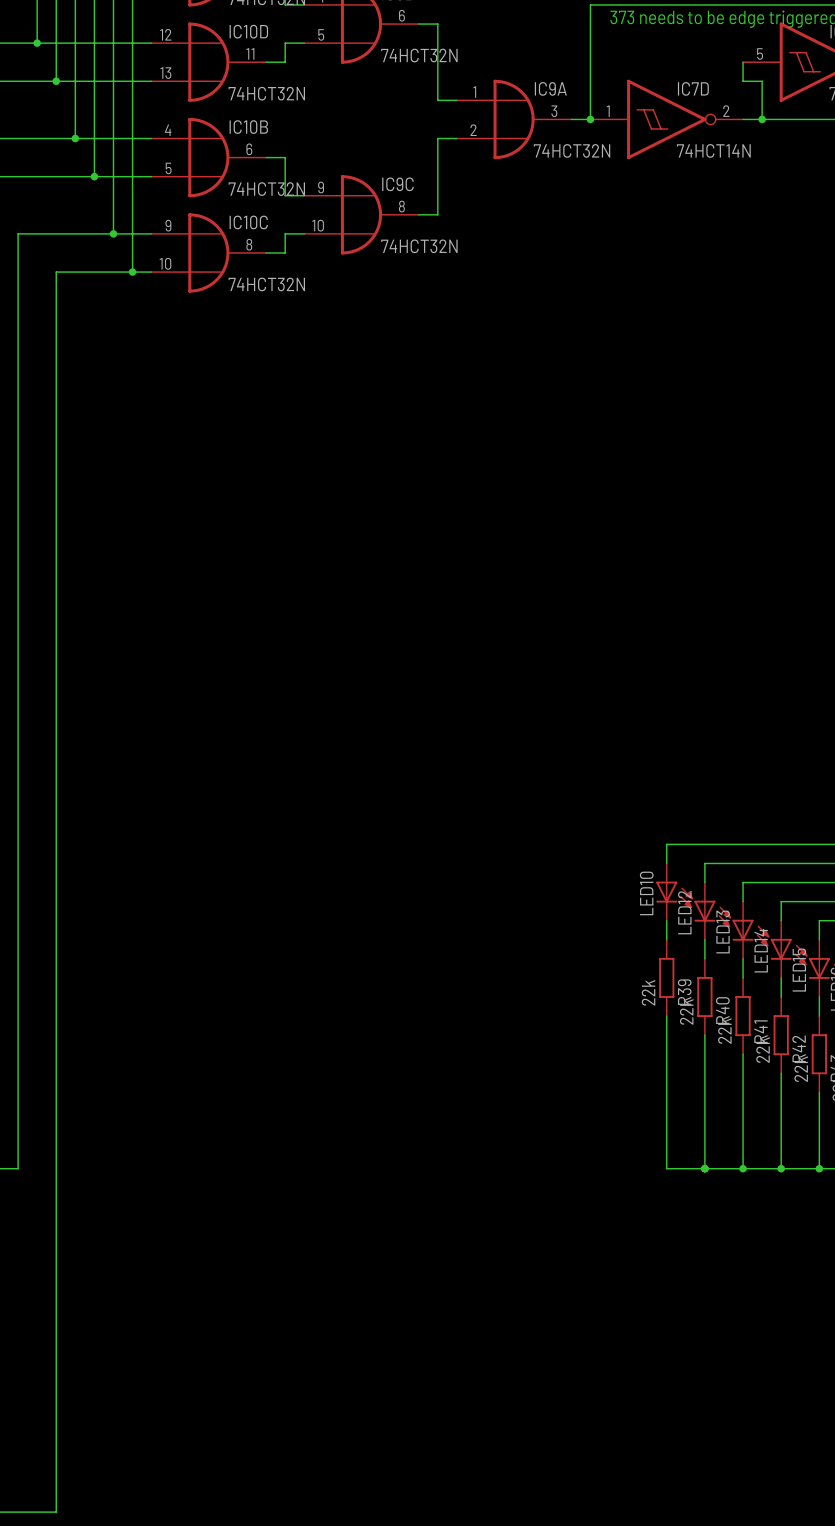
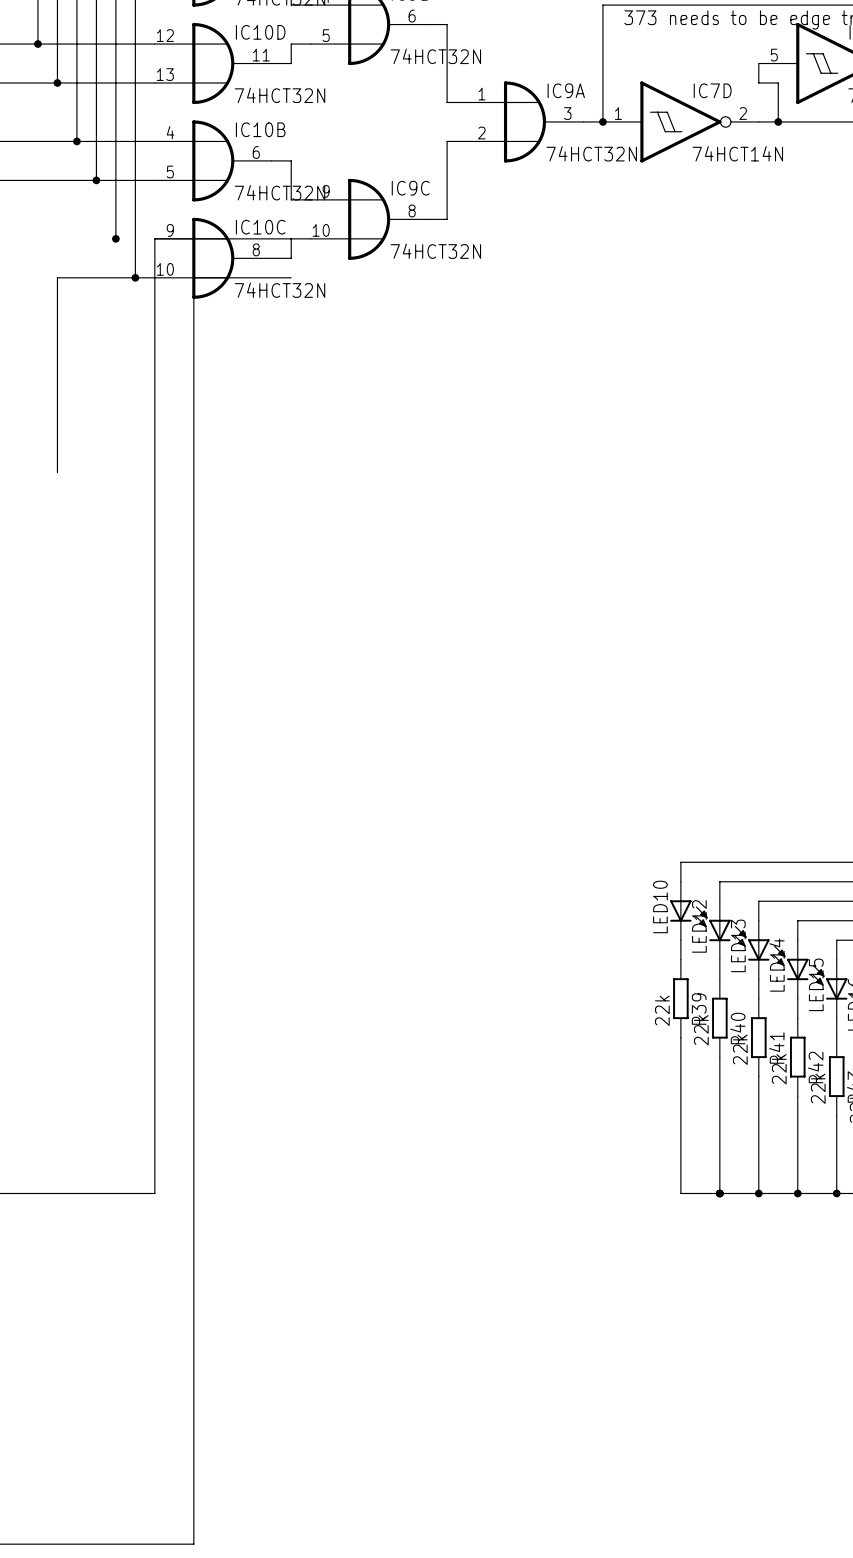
wire: (151, 233) (18, 233) (18, 1168) -> (291, 238) (154, 238) (154, 1193) (18, 1193)
wire: (56, 462) (56, 1512) -> (291, 277) (193, 277) (193, 1544) (57, 1544)

